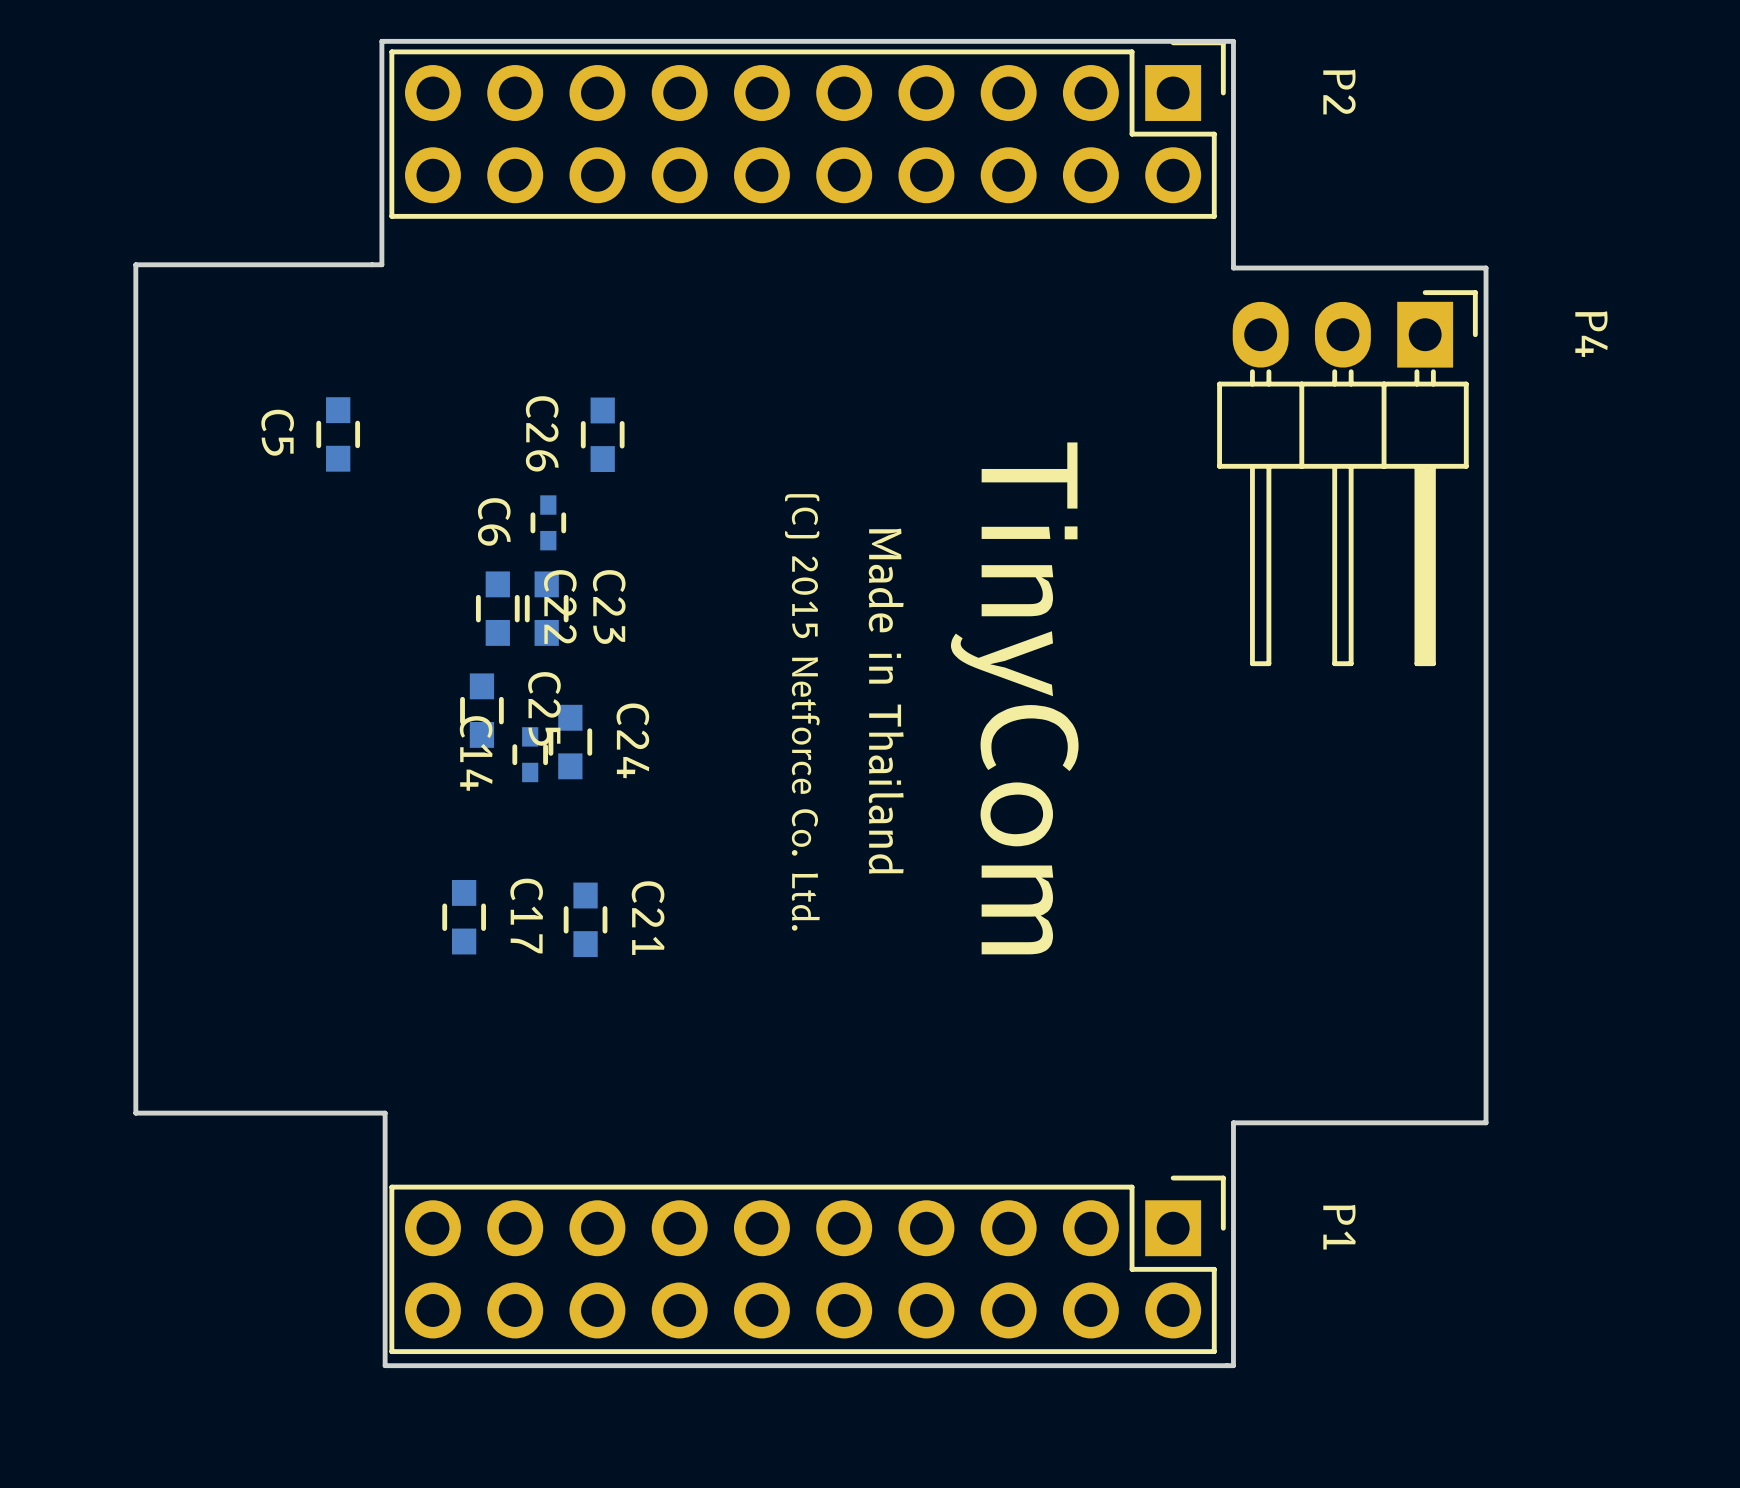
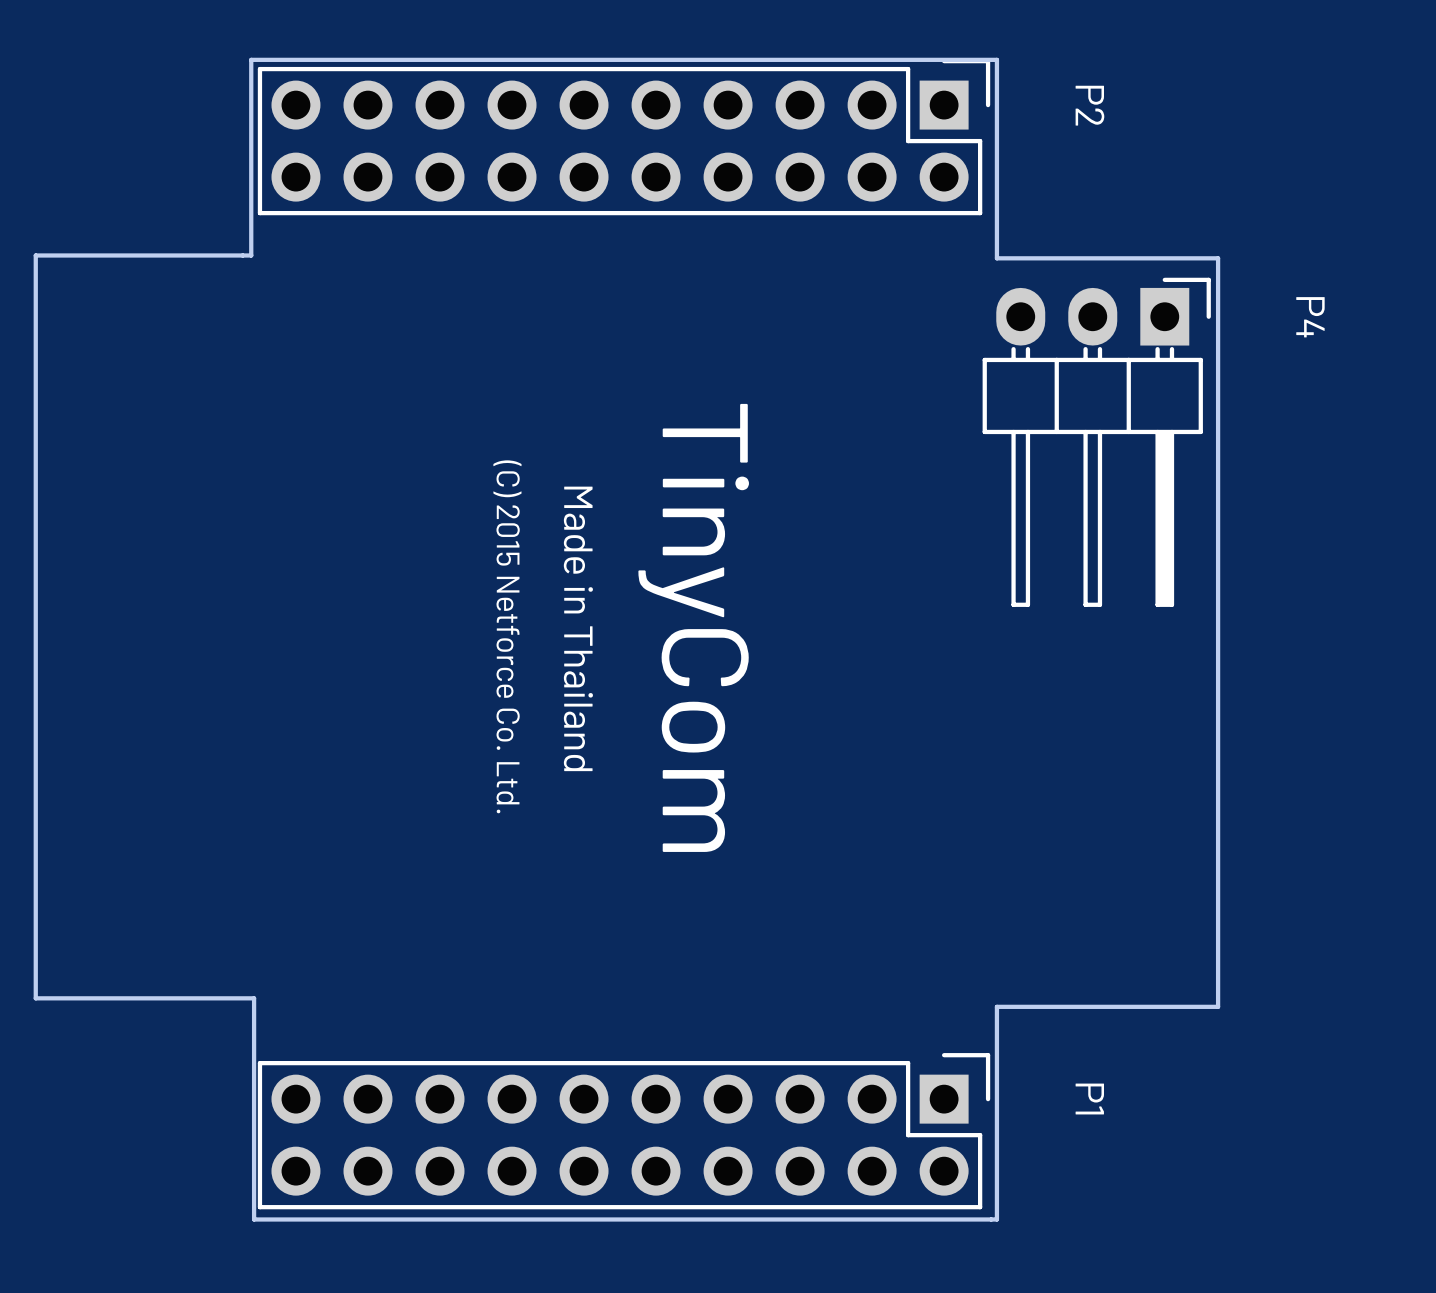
C5: (338, 434) -> none
C26: (602, 434) -> none
C6: (548, 522) -> none
C22: (497, 608) -> none
C23: (546, 608) -> none
text position: TinyCom (1014, 698) -> TinyCom (693, 627)
text position: Made in Thailand (886, 701) -> Made in Thailand (578, 628)
C25: (481, 710) -> none
text position: (C) 2015 Netforce Co. Ltd. (802, 712) -> (C) 2015 Netforce Co. Ltd. (507, 636)
C24: (570, 742) -> none
C14: (530, 754) -> none
C17: (464, 917) -> none
C21: (585, 919) -> none

